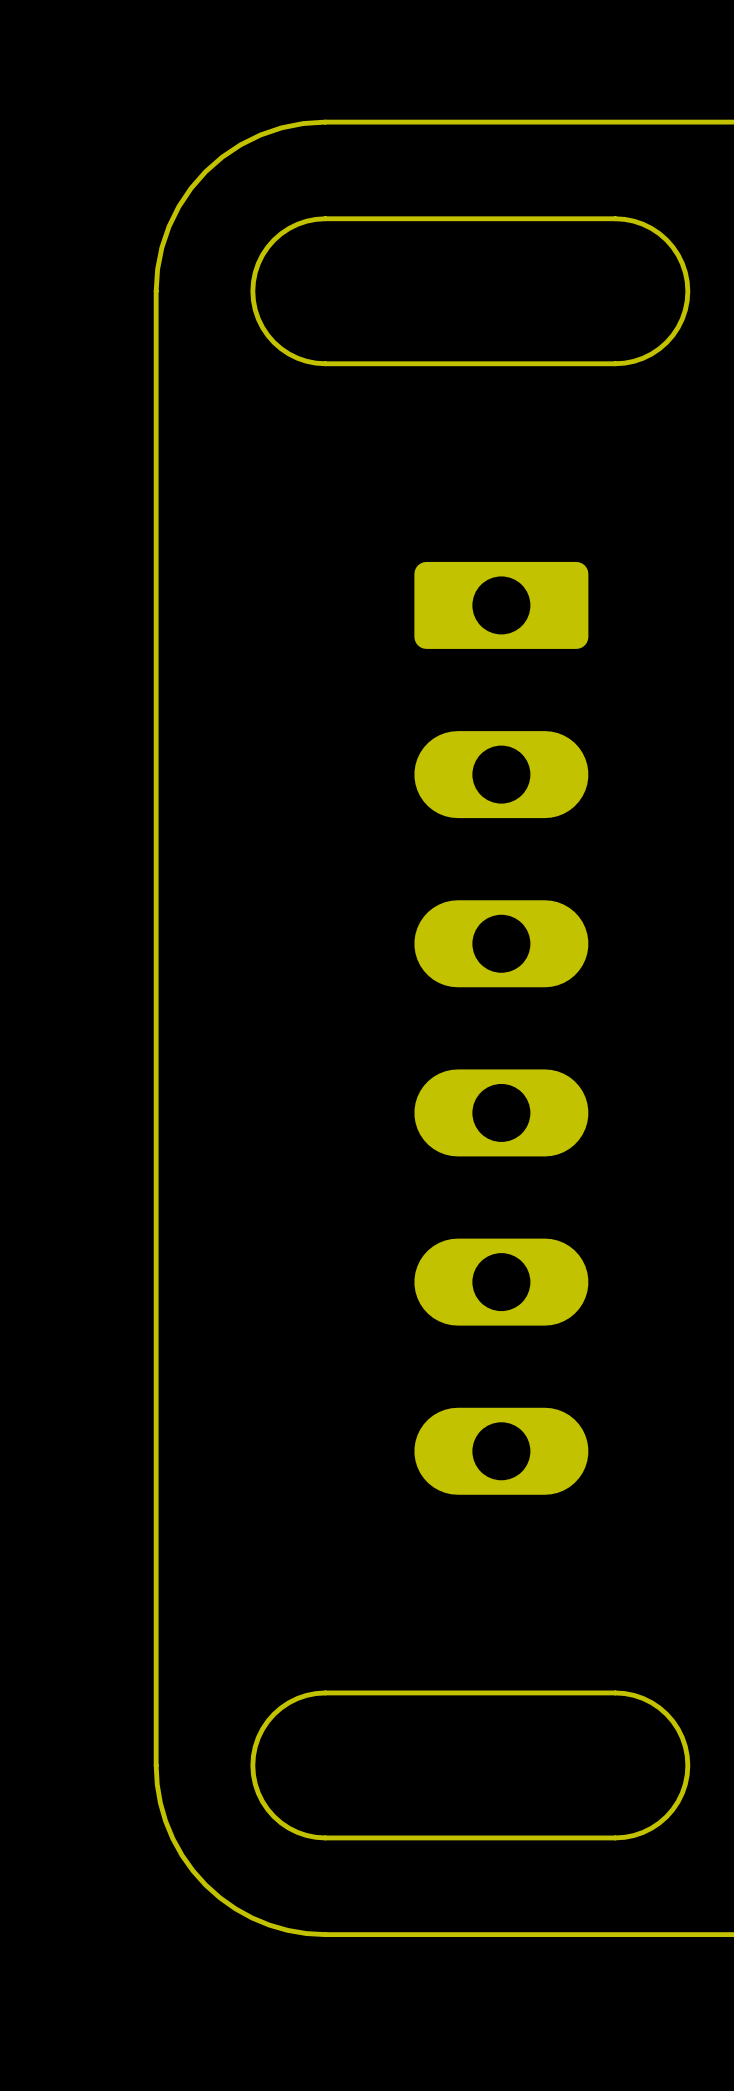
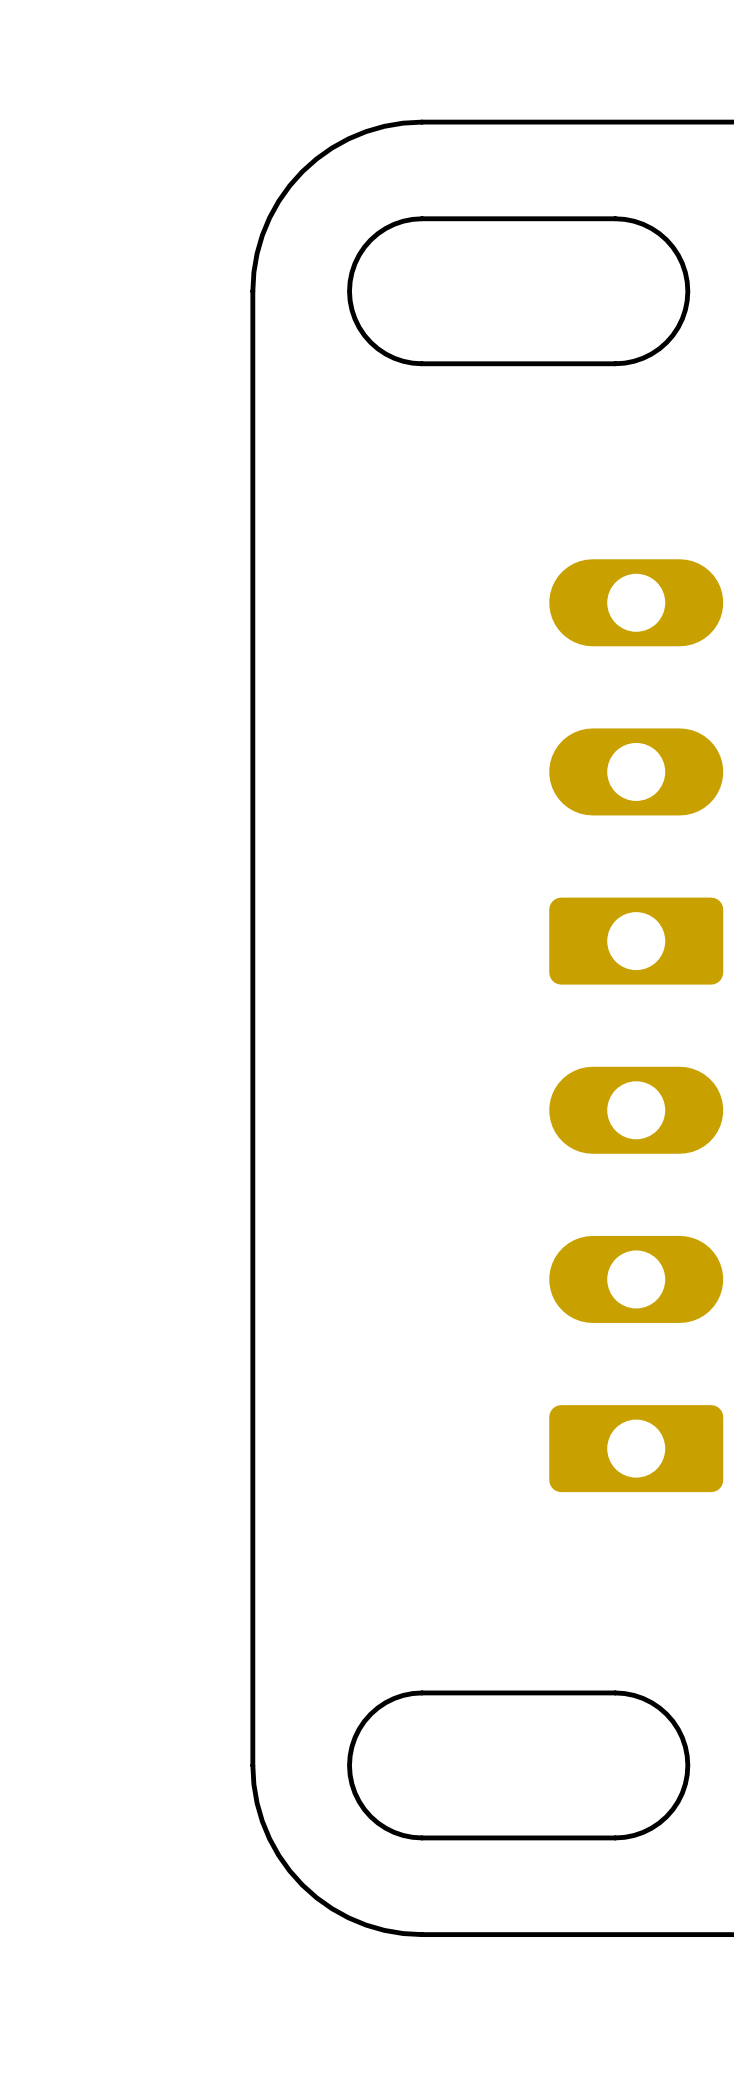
board edge: (422, 122) (303, 123) (260, 134) (240, 144) (205, 171) (178, 206) (161, 247) (156, 291) (157, 1784) (165, 1821) (182, 1855) (205, 1885) (235, 1908) (269, 1925) (306, 1933) (422, 1934) -> (422, 122) (384, 126) (366, 131) (331, 148) (302, 171) (278, 201) (269, 217) (257, 253) (252, 291) (253, 1784) (262, 1821) (278, 1855) (289, 1870) (316, 1897) (348, 1917) (366, 1925) (403, 1933) (422, 1934)
board edge: (422, 218) (325, 218) (297, 224) (281, 233) (267, 247) (258, 263) (252, 291) (258, 319) (267, 335) (281, 348) (297, 358) (325, 363) (422, 363) -> (422, 218) (394, 224) (370, 240) (355, 263) (349, 291) (355, 319) (370, 342) (394, 358) (422, 363)
part: none -> (636, 771)
part: (501, 1028) -> none
part: none -> (636, 1279)
board edge: (422, 1692) (325, 1692) (297, 1698) (281, 1707) (267, 1721) (258, 1737) (252, 1765) (258, 1793) (267, 1809) (281, 1822) (297, 1832) (325, 1837) (422, 1837) -> (422, 1692) (394, 1698) (370, 1714) (355, 1737) (349, 1765) (355, 1793) (370, 1816) (394, 1832) (422, 1837)

